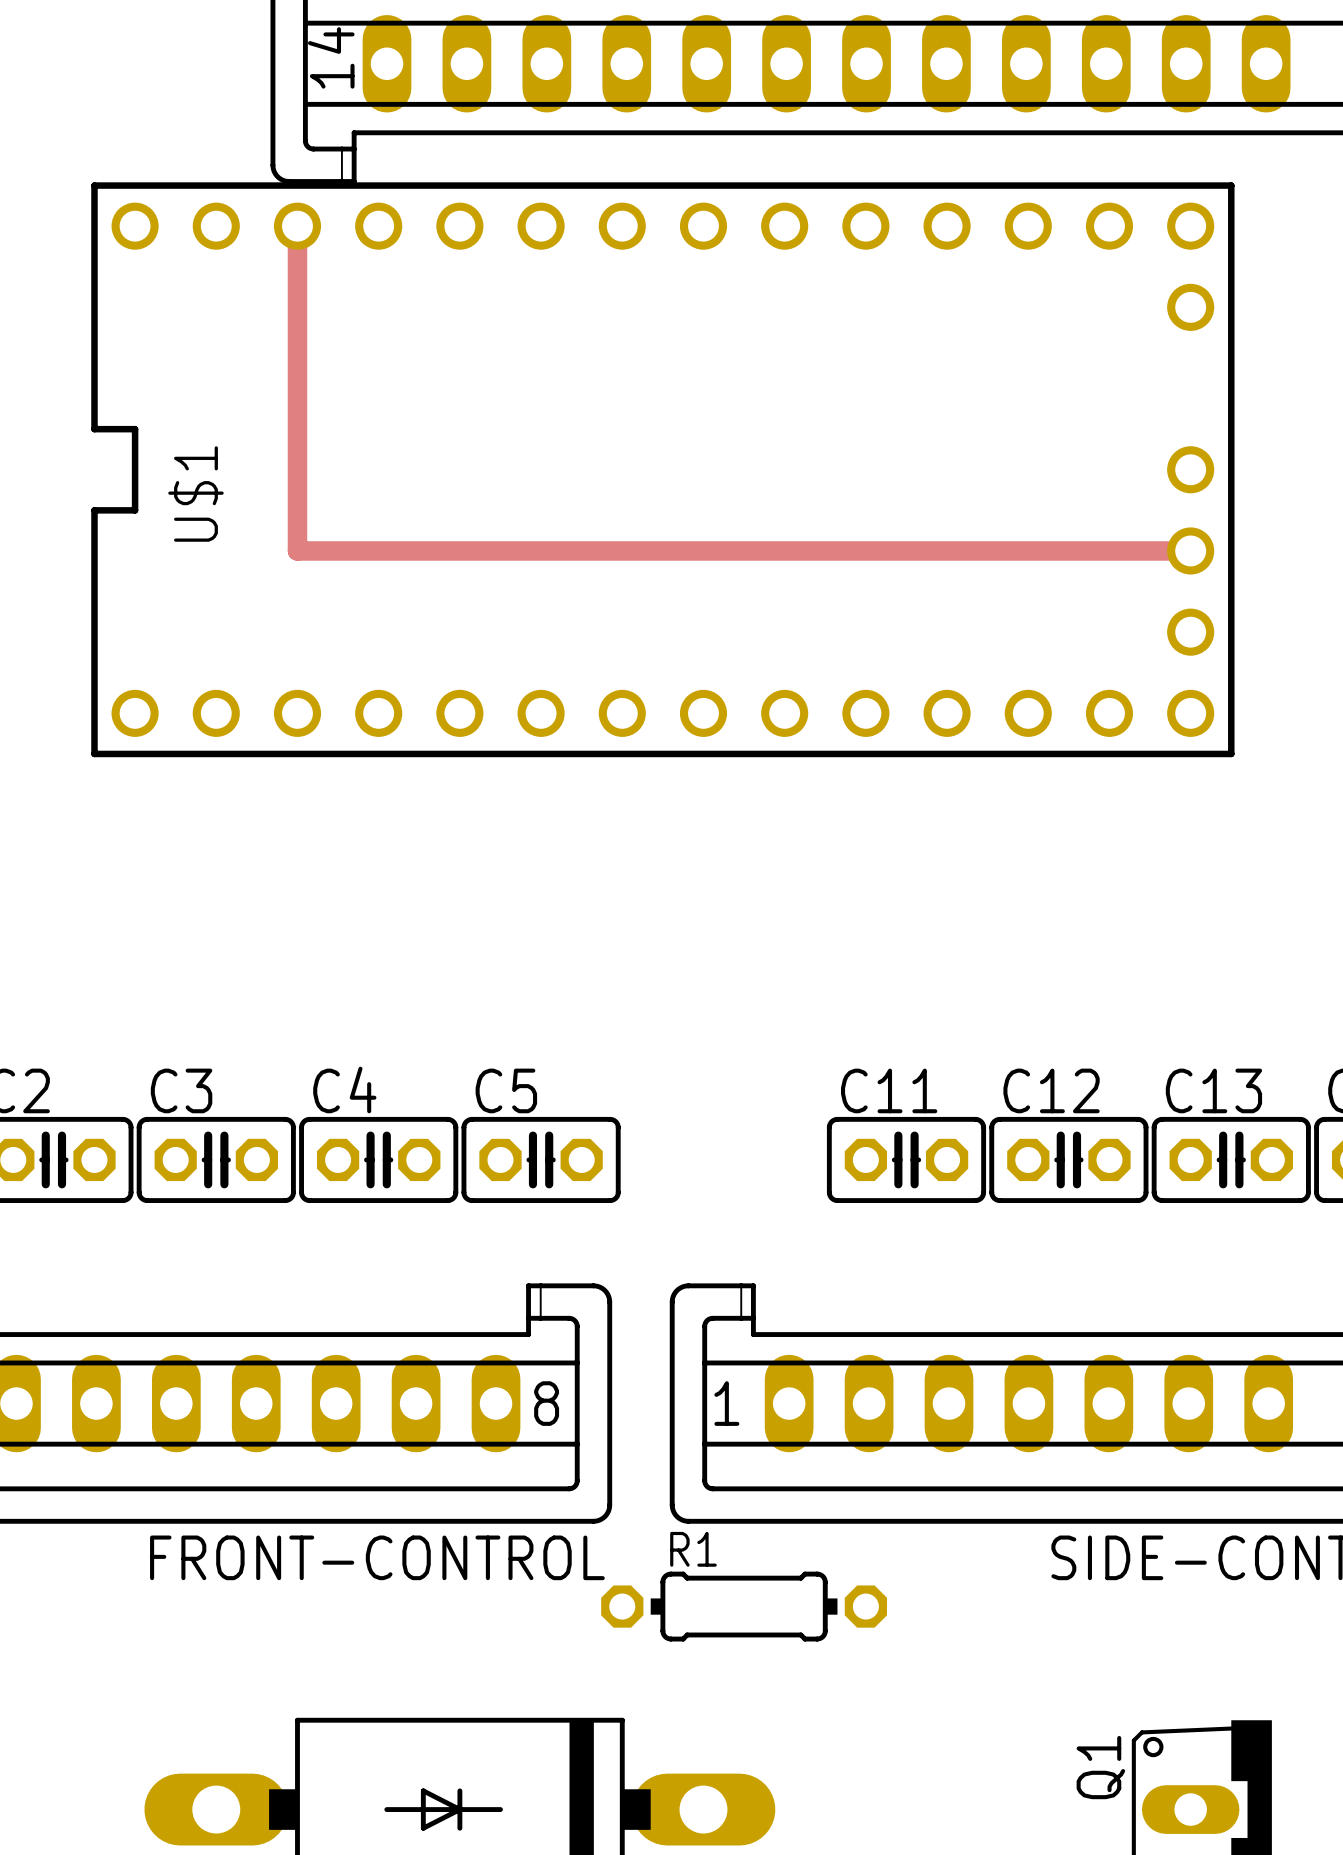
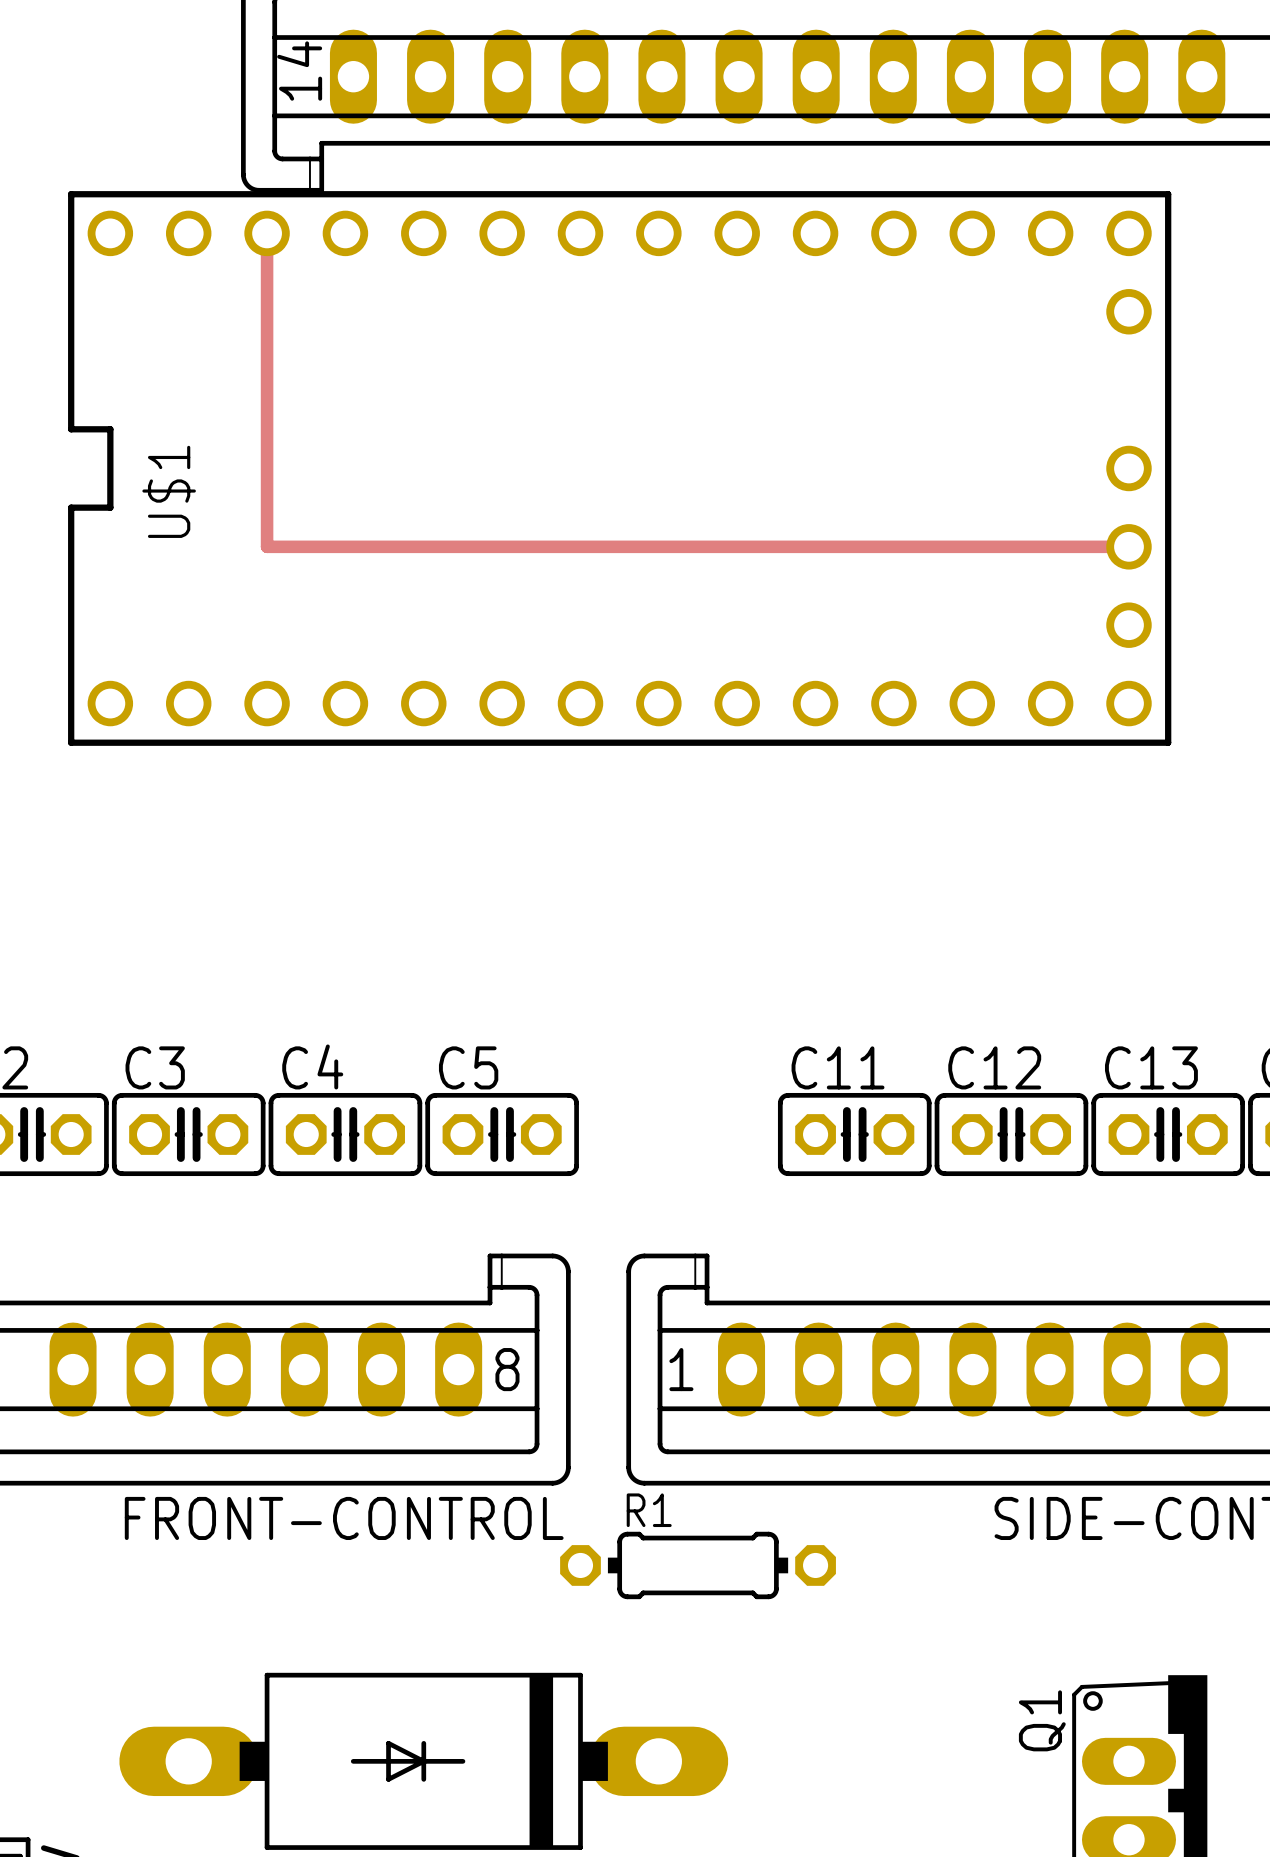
track width: thick (297, 226) (297, 550) (1190, 550) -> thin (267, 233) (267, 546) (1128, 546)

